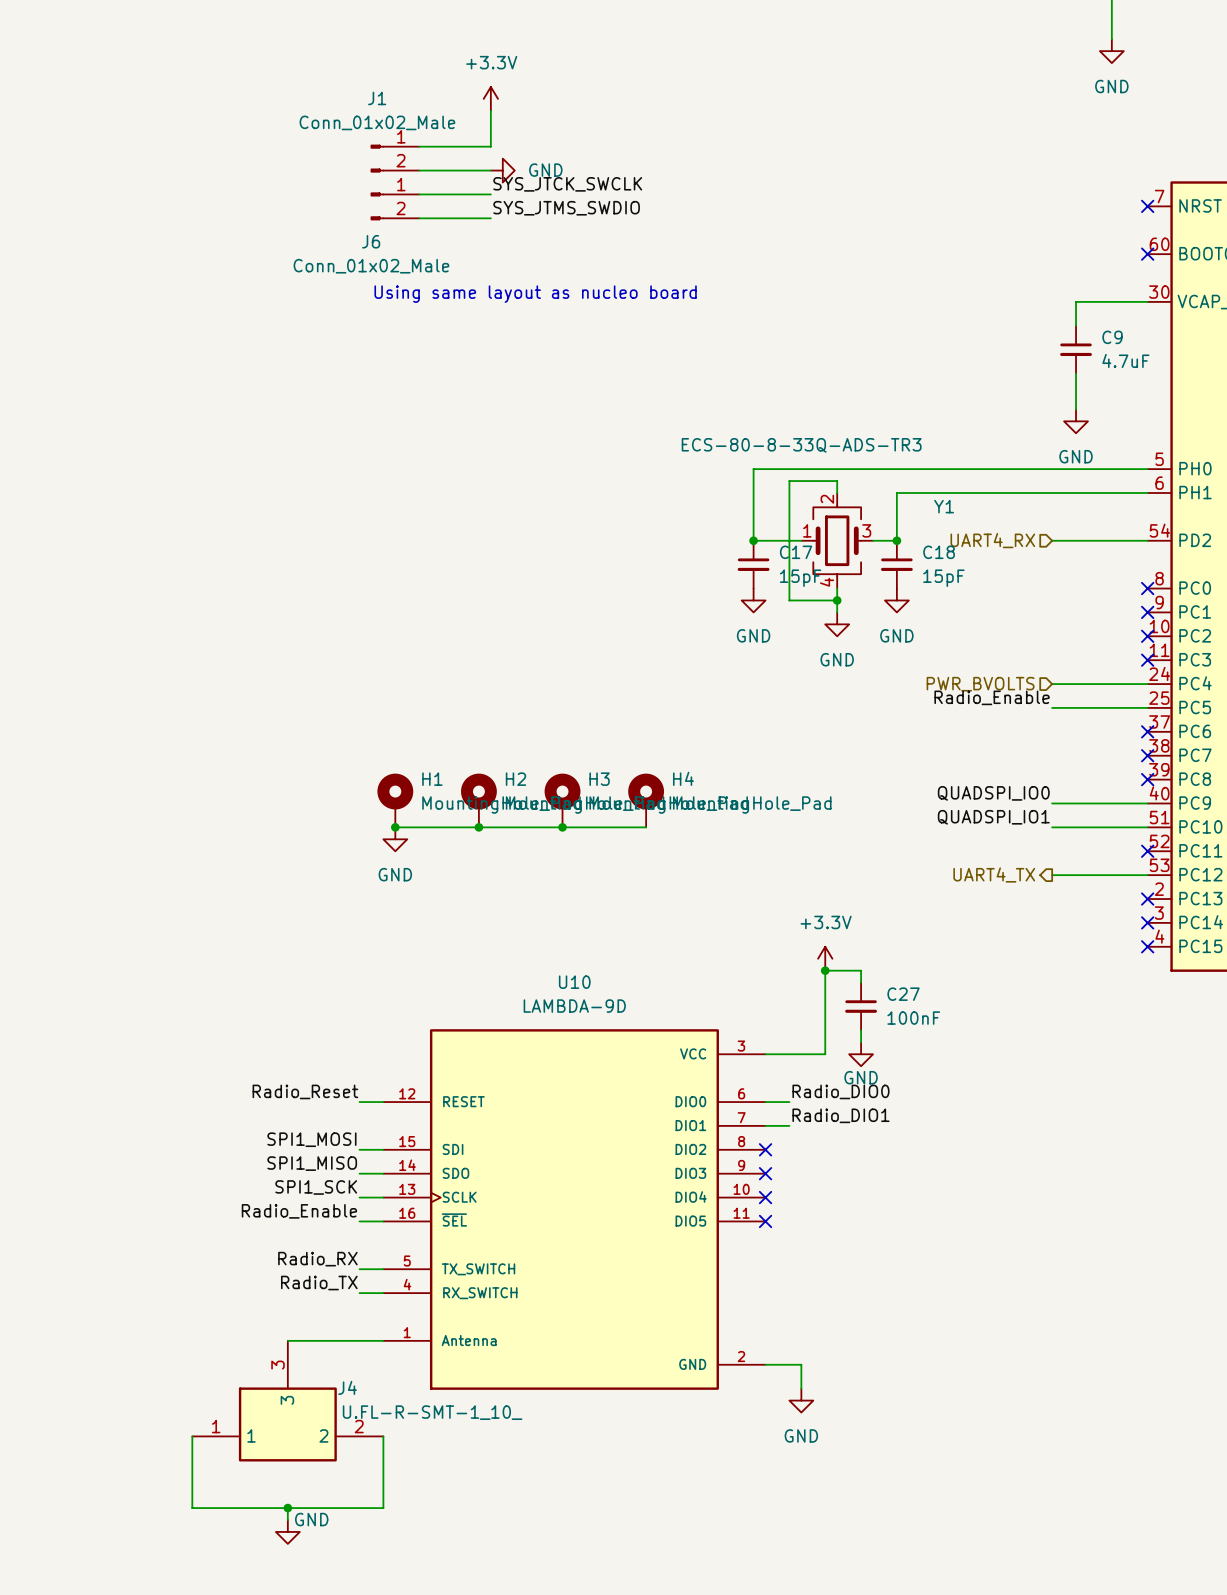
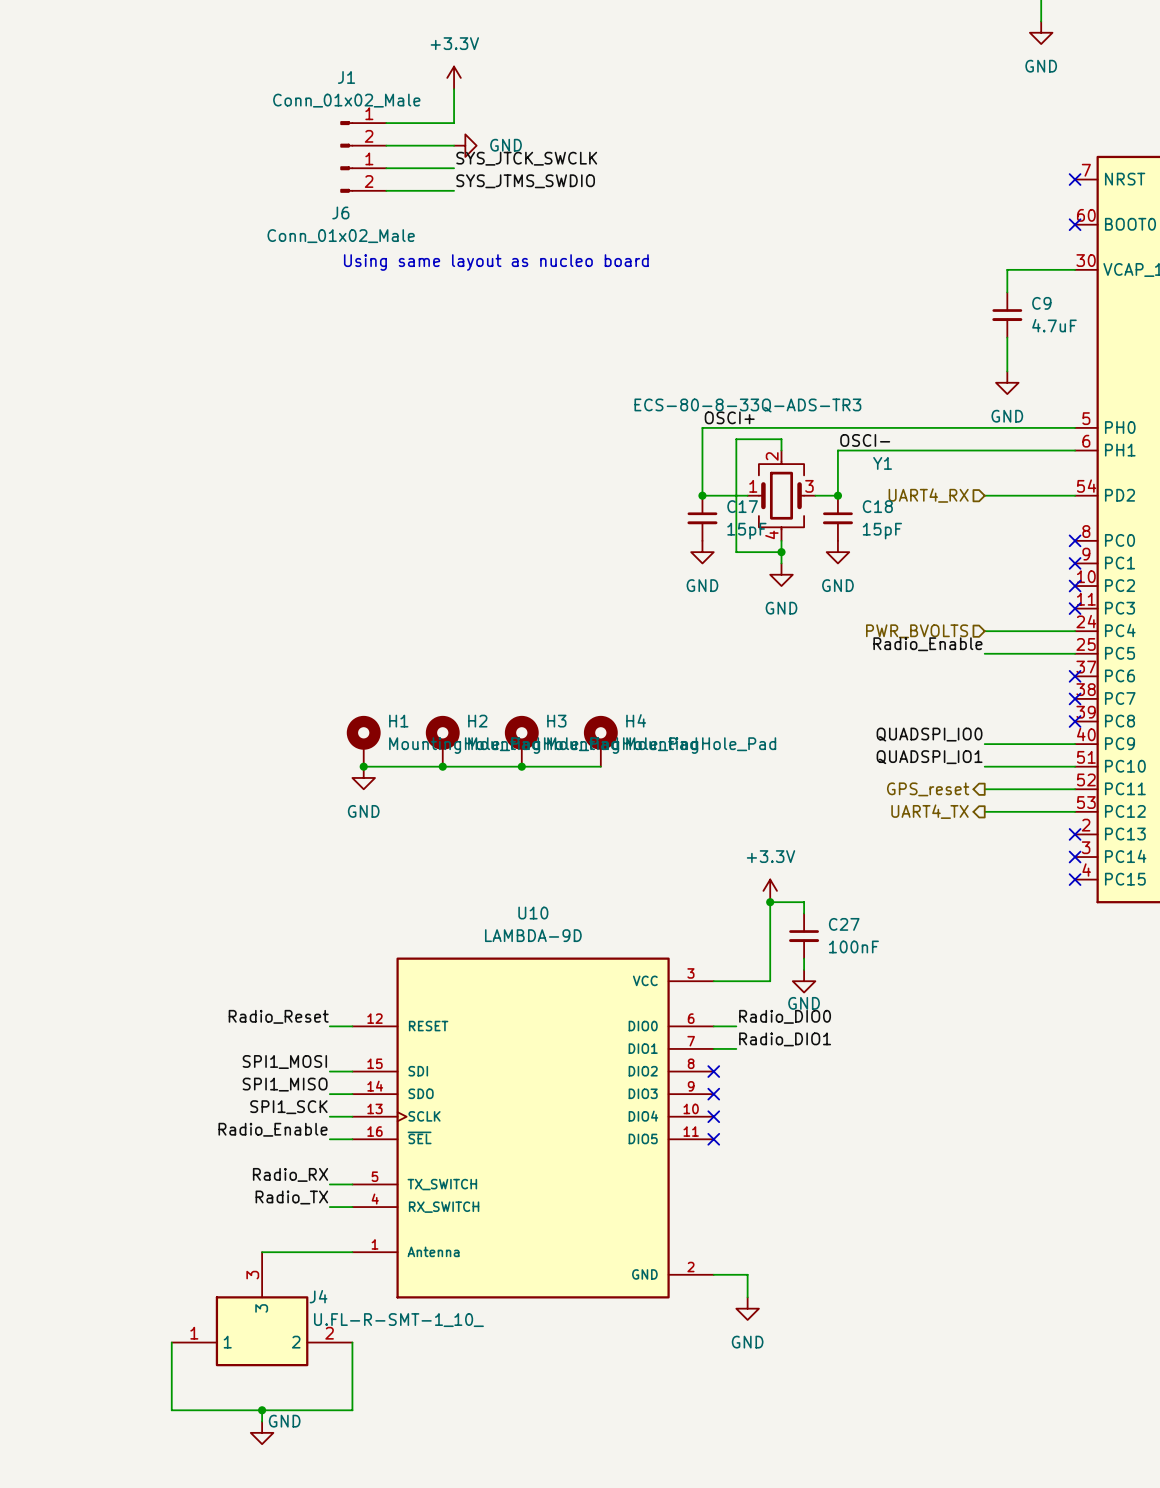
label: none -> OSCI+ (729, 417)
label: none -> OSCI- (865, 440)
hierarchical label: none -> GPS_reset (928, 789)
wire: none -> (984, 789) (1075, 789)
no-connect mark: (1147, 851) -> none

